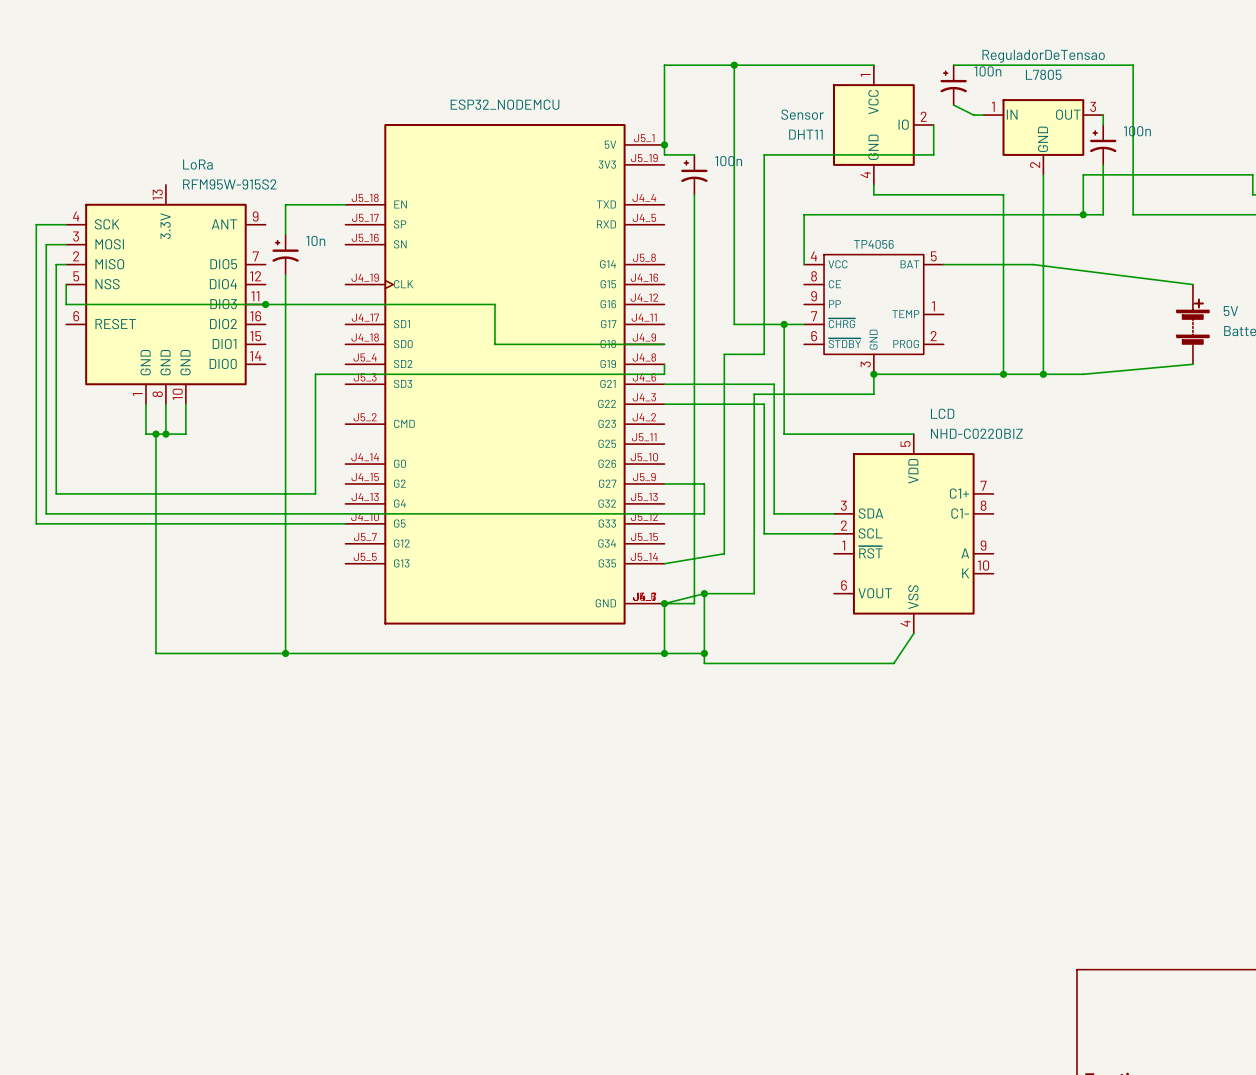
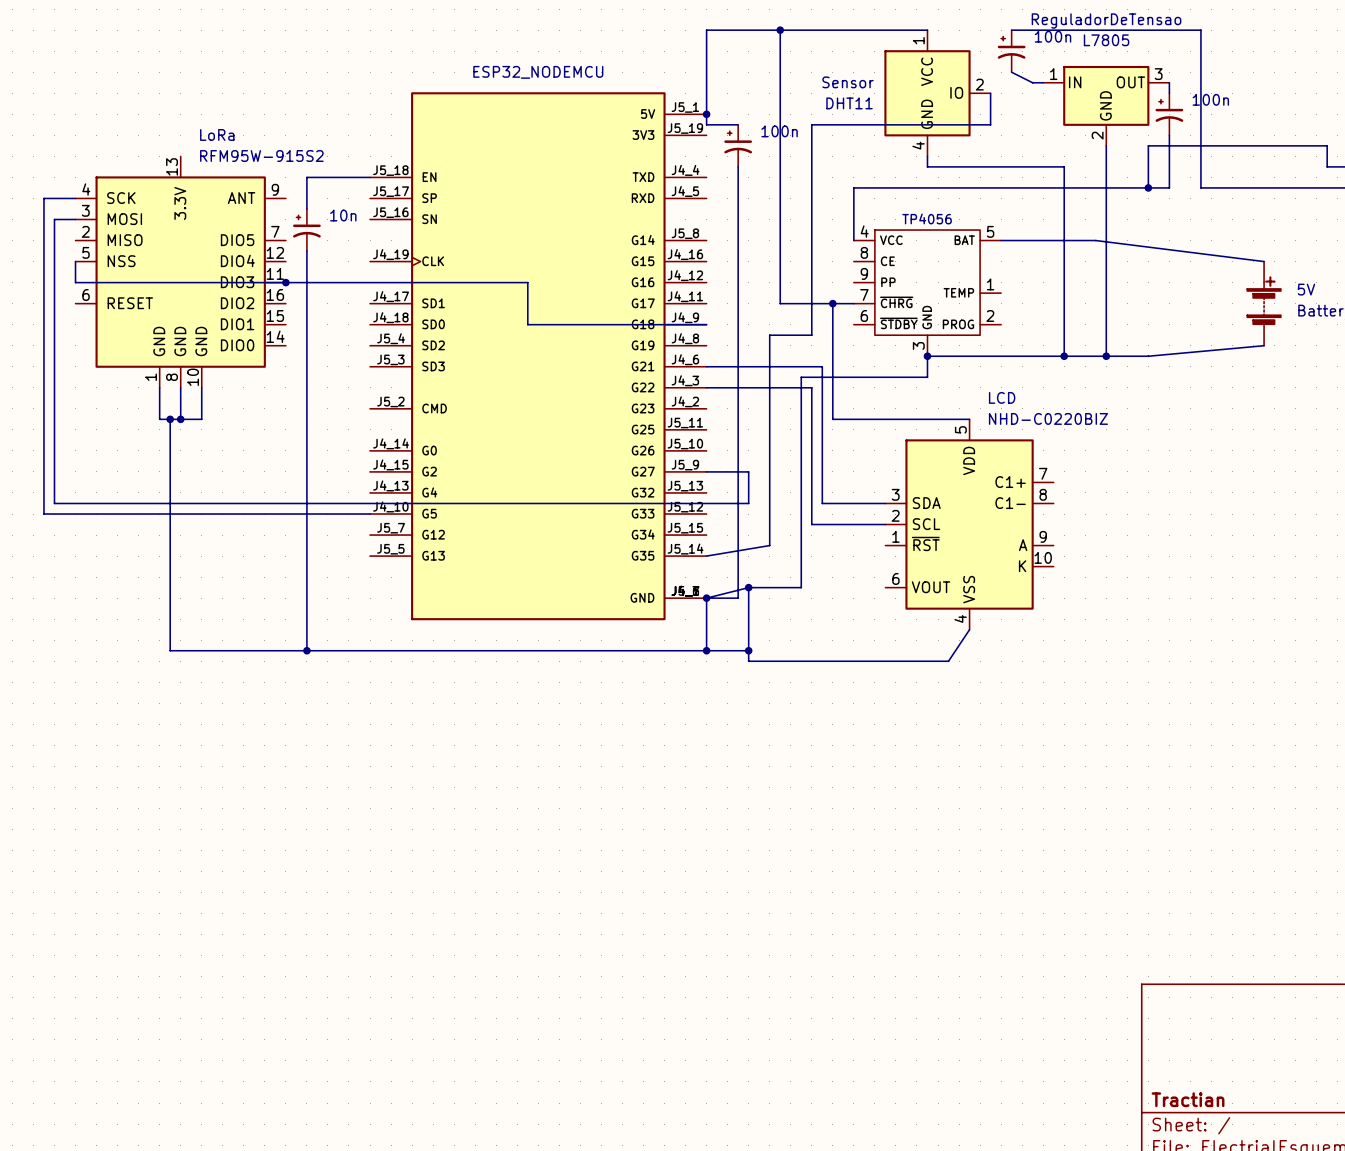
wire: (66, 264) (56, 264) (56, 493) (315, 493) (315, 374) (664, 374) (664, 364) -> none

